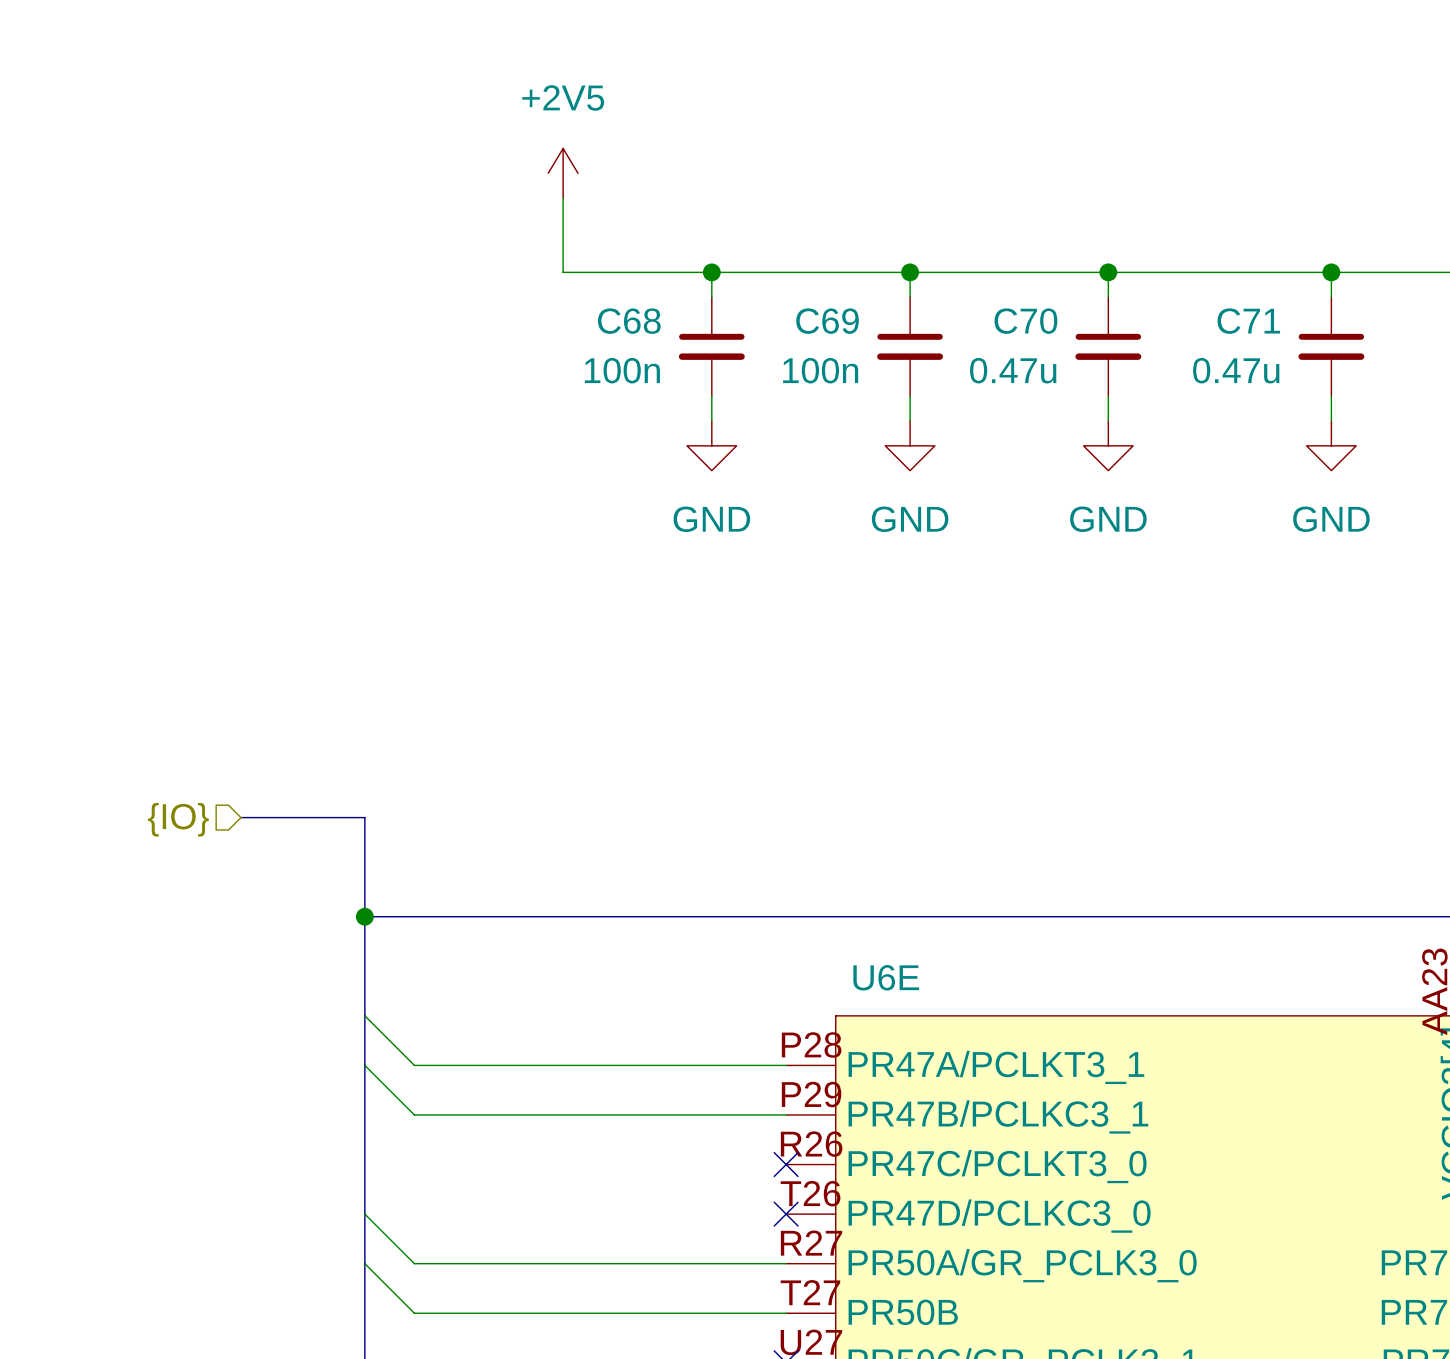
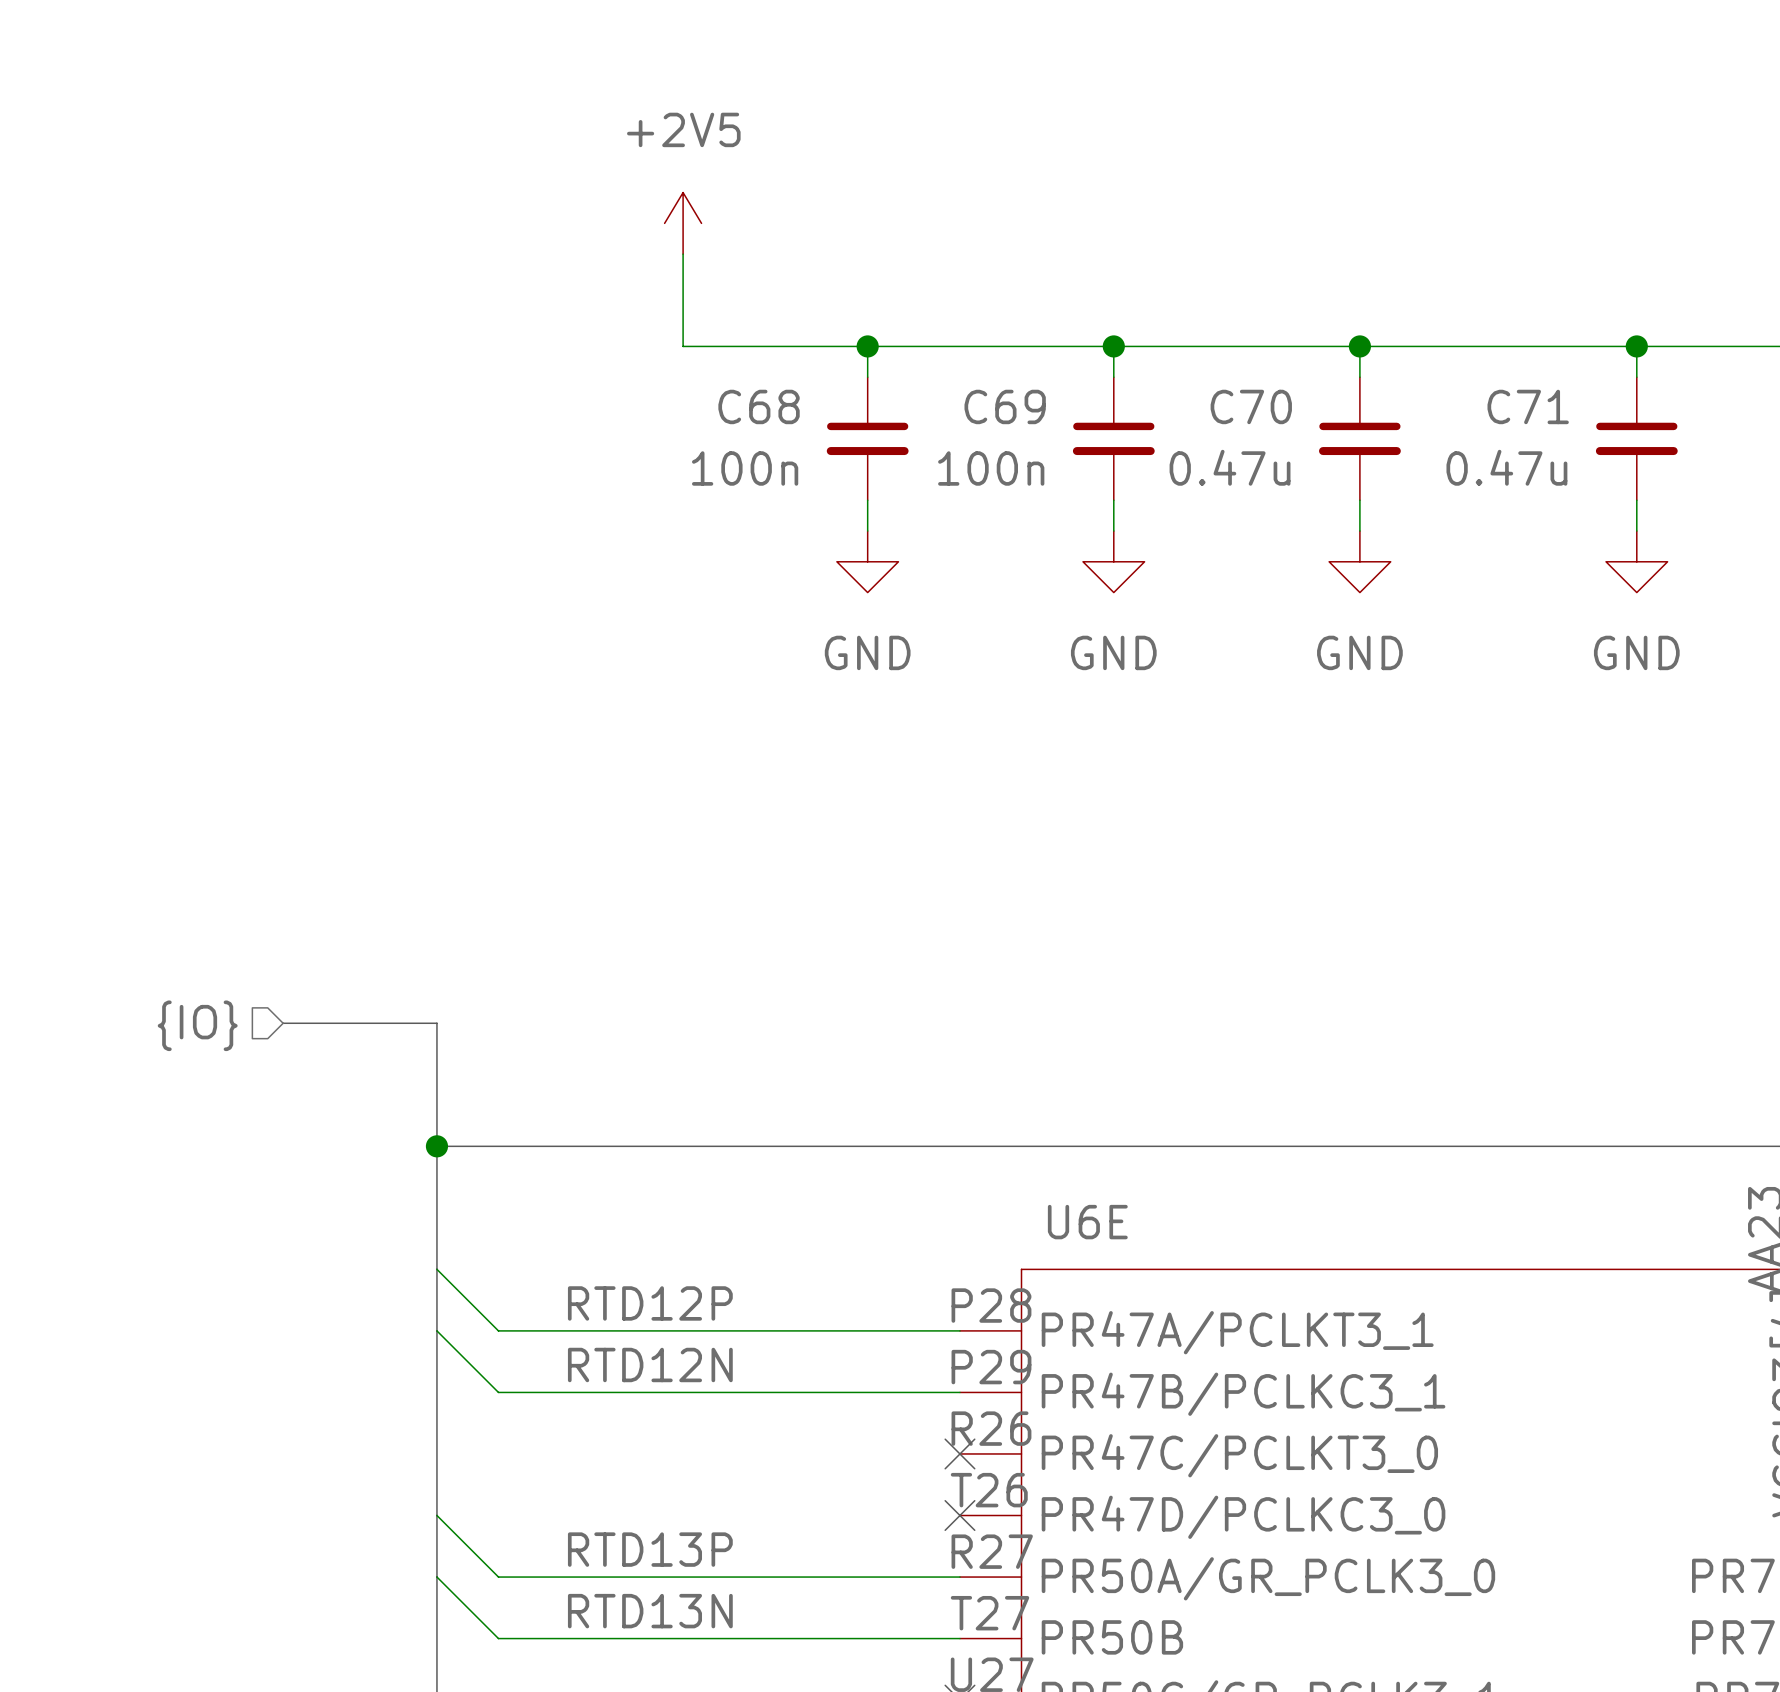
label: none -> RTD12P (650, 1303)
label: none -> RTD12N (650, 1364)
label: none -> RTD13P (650, 1549)
label: none -> RTD13N (650, 1611)

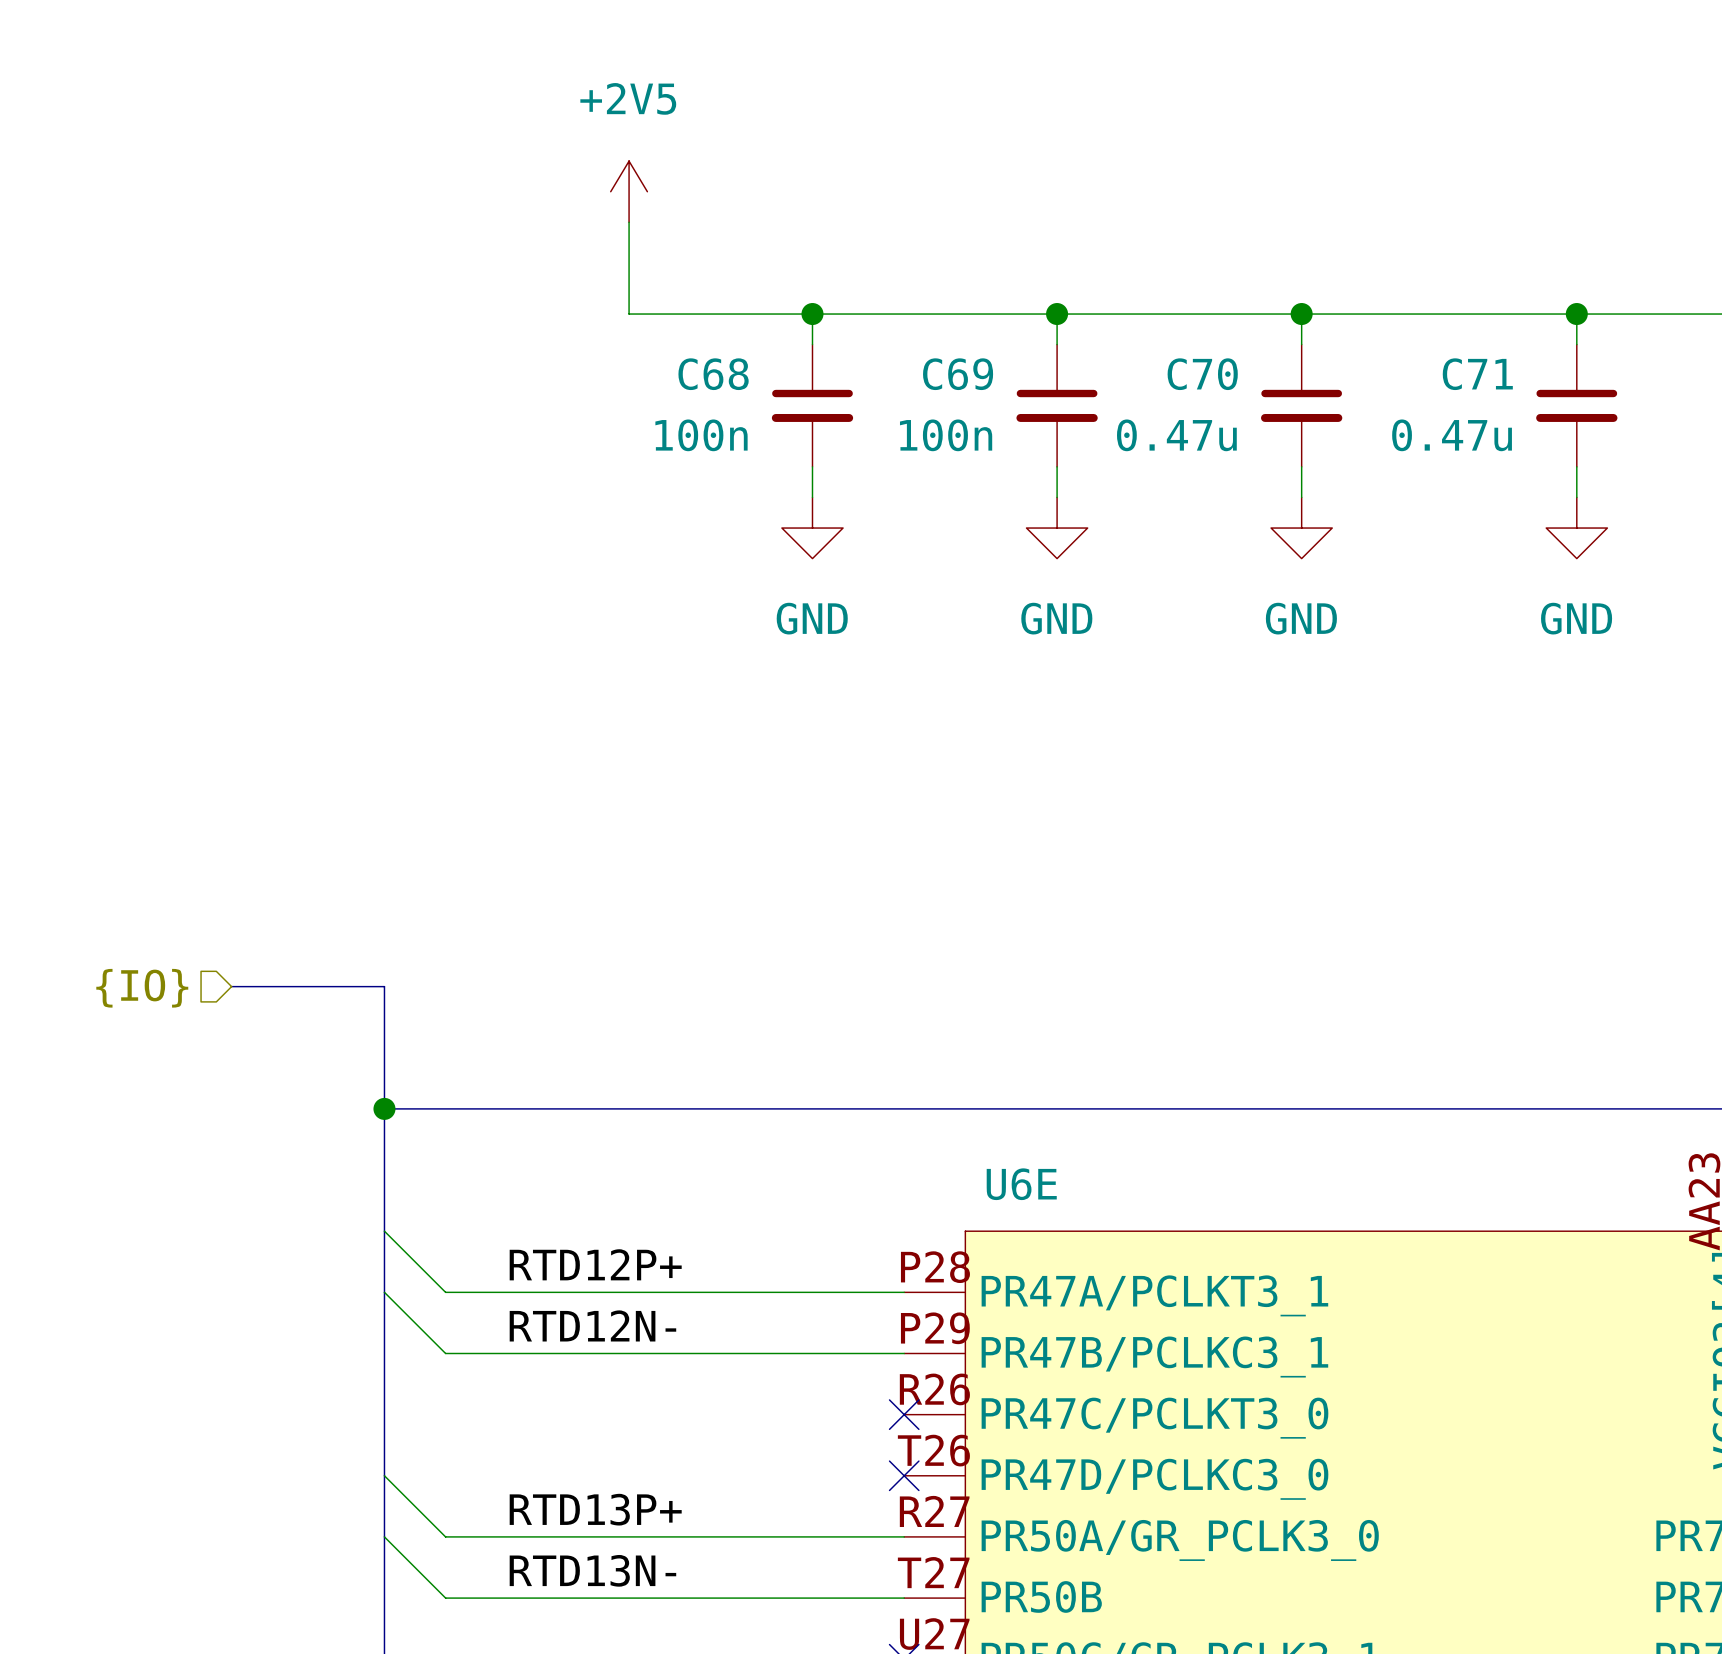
label: RTD12P (650, 1303) -> RTD12P+ (595, 1264)
label: RTD12N (650, 1364) -> RTD12N- (592, 1325)
label: RTD13P (650, 1549) -> RTD13P+ (595, 1509)
label: RTD13N (650, 1611) -> RTD13N- (592, 1570)

